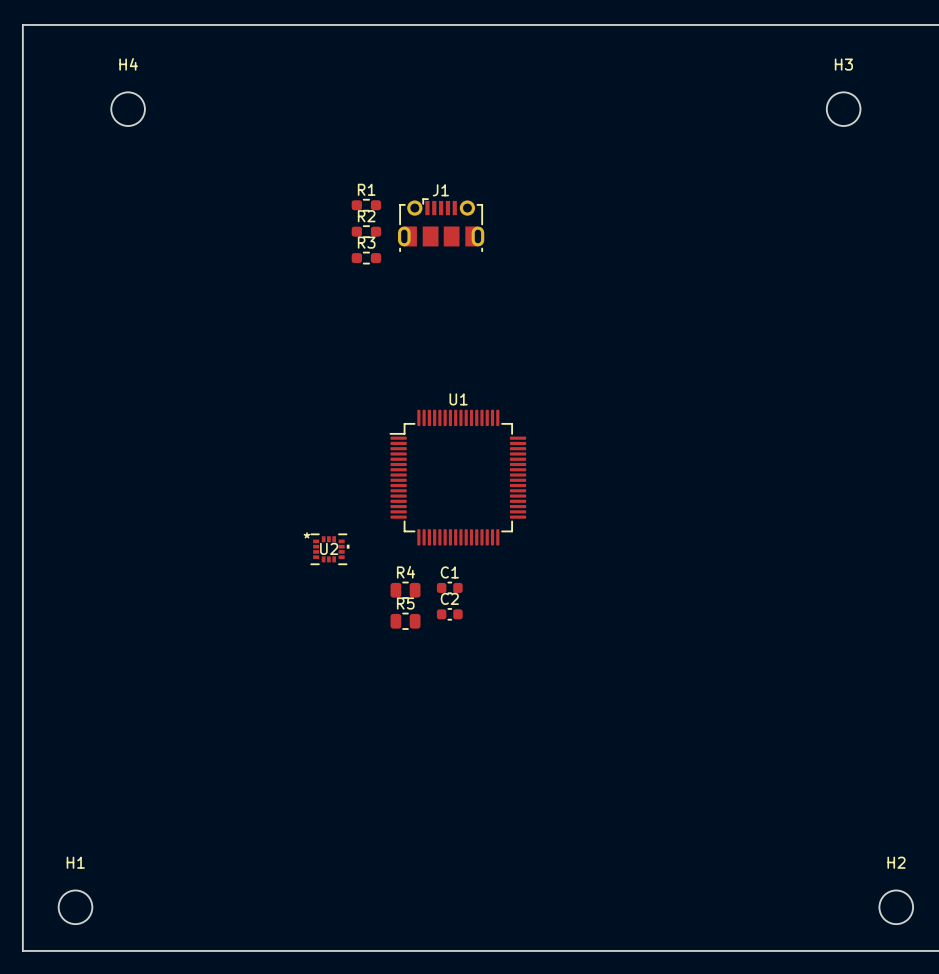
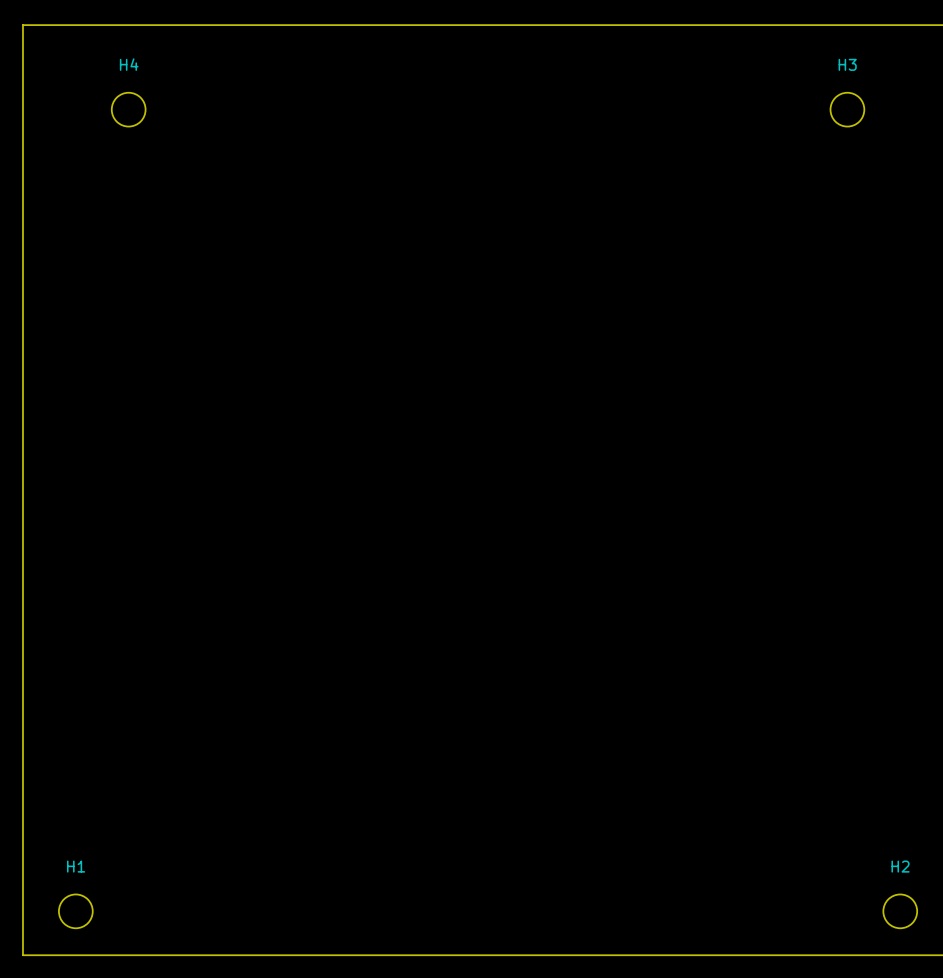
R1: (366, 205) -> none
J1: (441, 225) -> none
R2: (366, 231) -> none
R3: (366, 258) -> none
U1: (458, 477) -> none
U2: (329, 549) -> none
C1: (449, 587) -> none
R4: (405, 590) -> none
C2: (449, 614) -> none
R5: (405, 621) -> none

